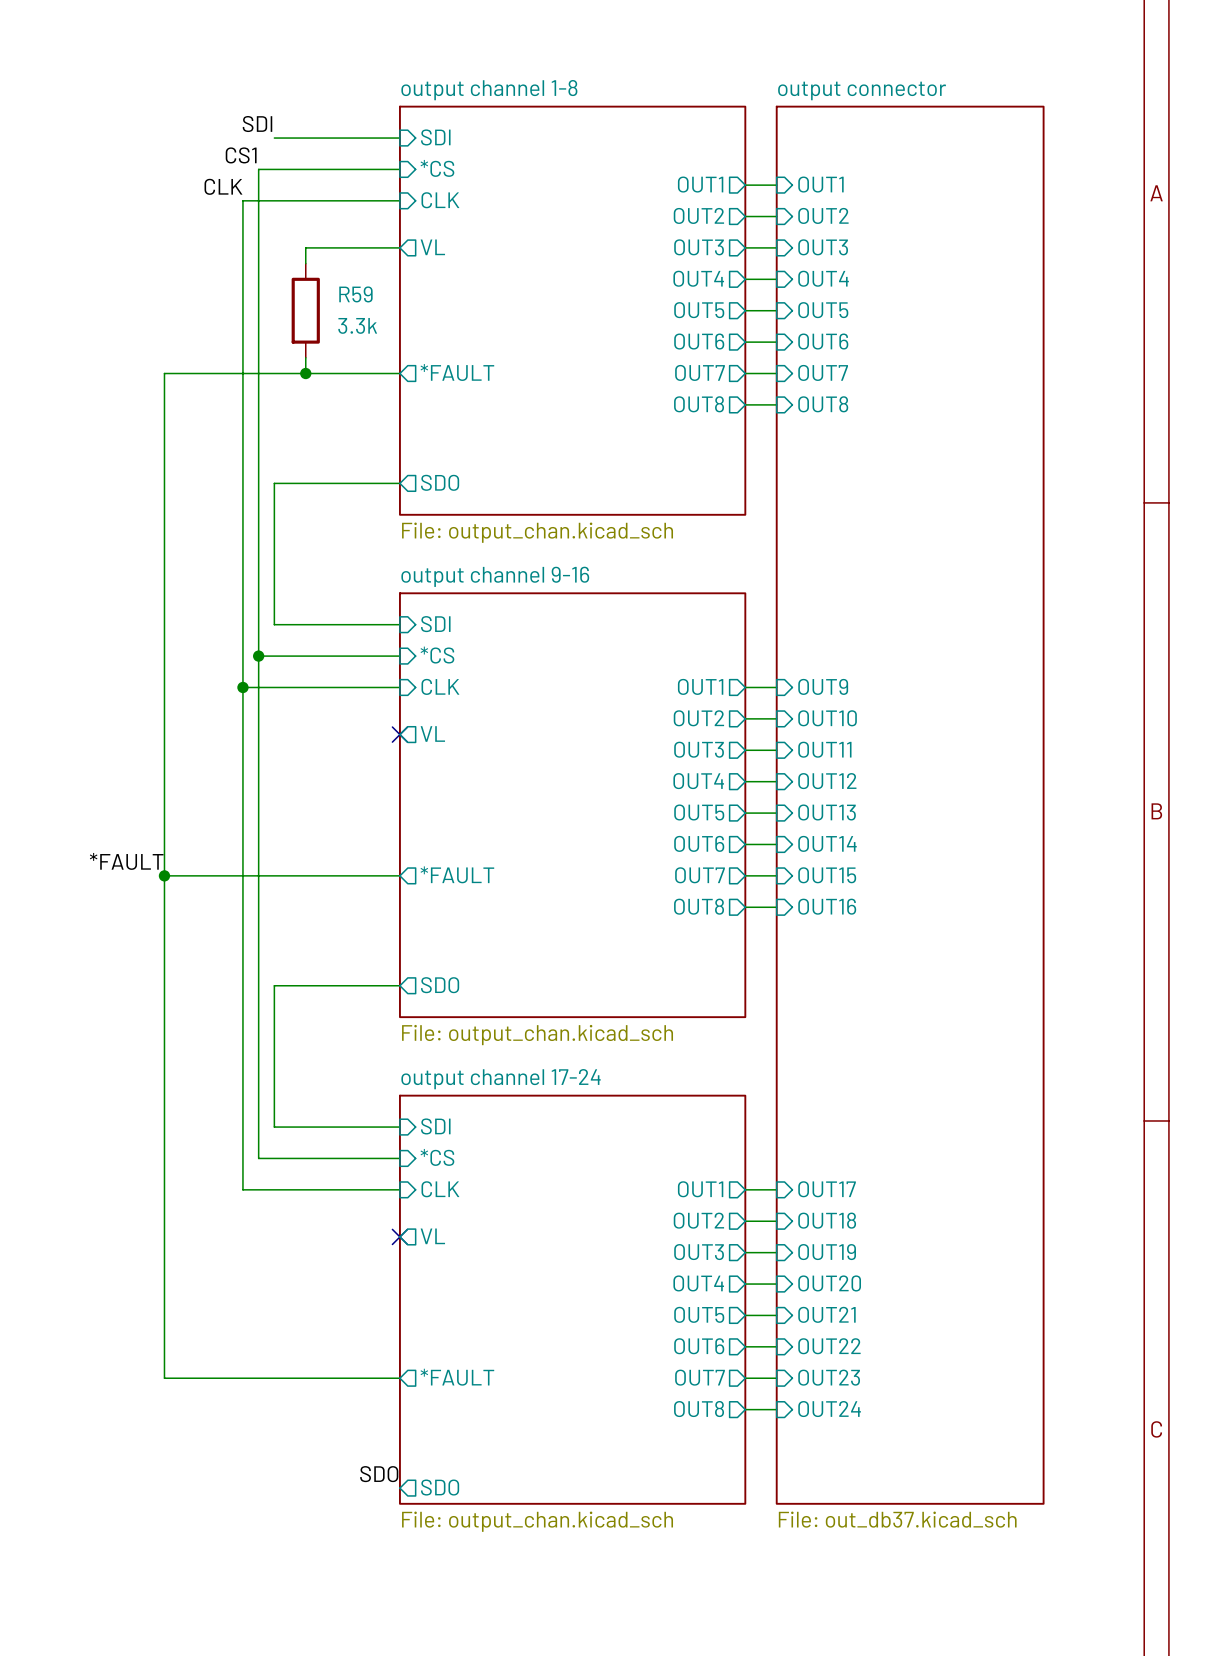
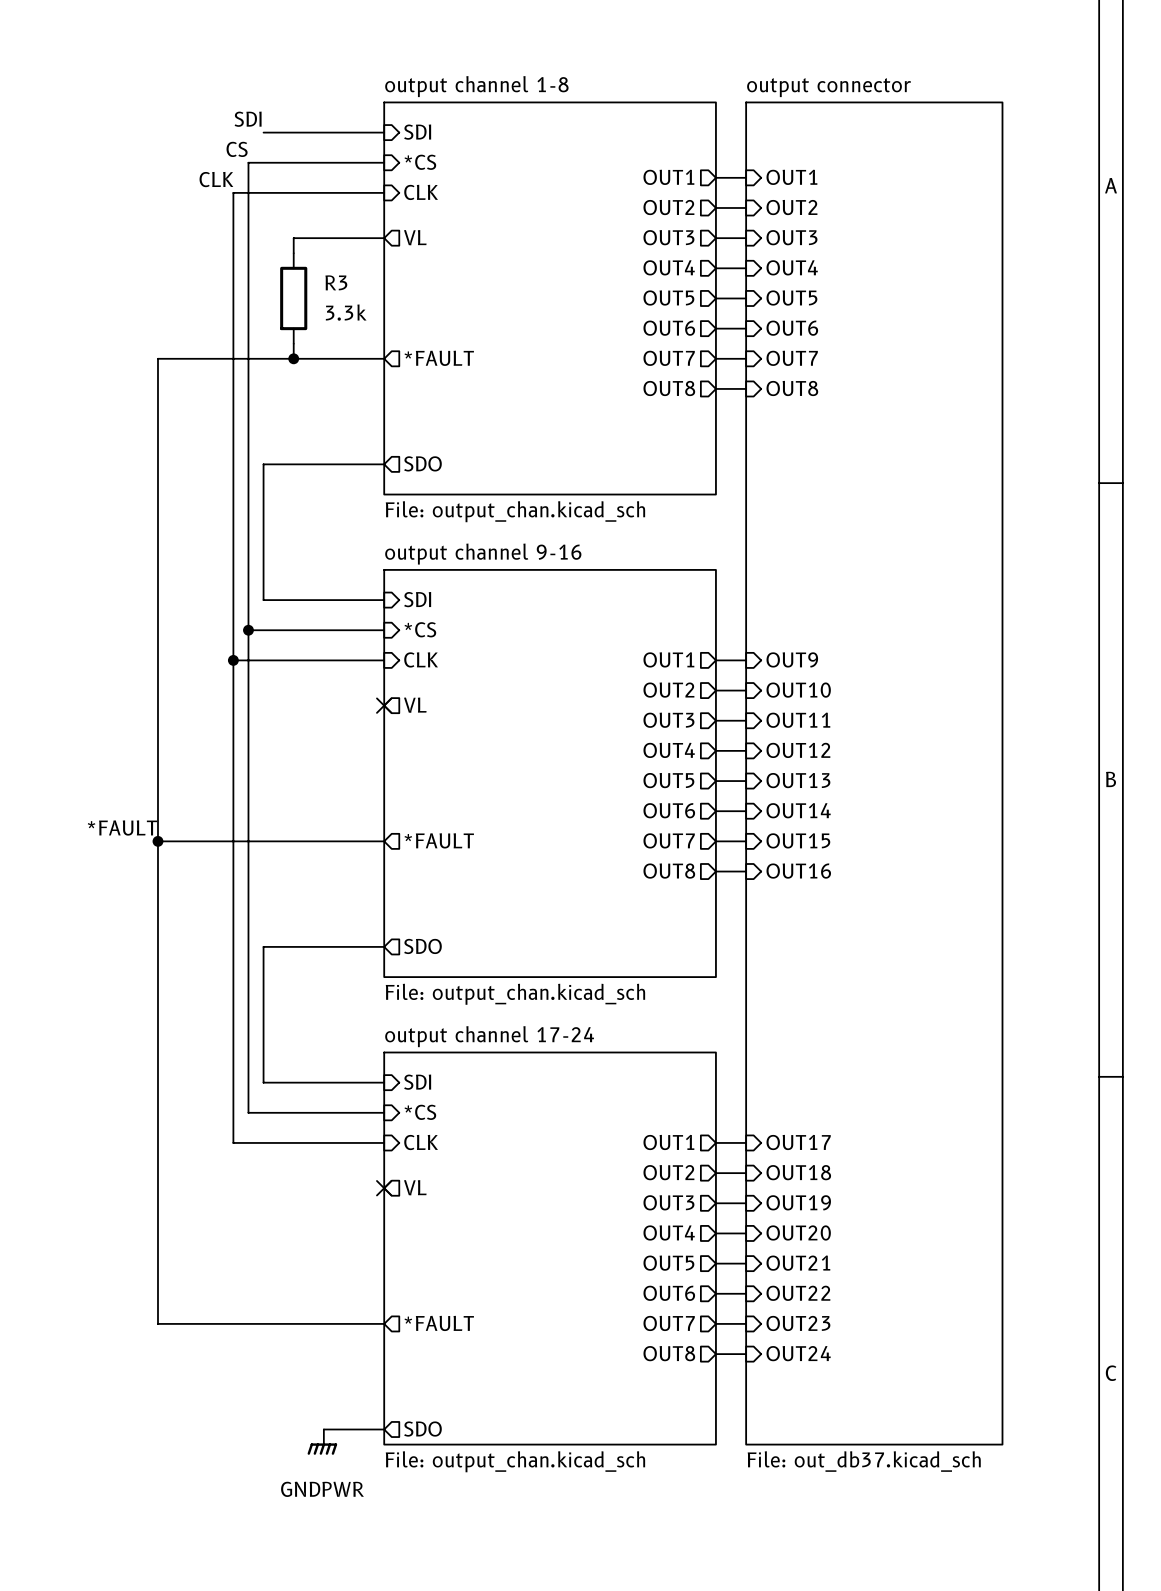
label: CS1 (241, 155) -> CS (237, 149)
R59 name: R59 (355, 294) -> R3 (336, 282)
label: SDO (379, 1474) -> none
wire: none -> (323, 1429) (384, 1429)
power symbol: none -> GNDPWR (322, 1442)

